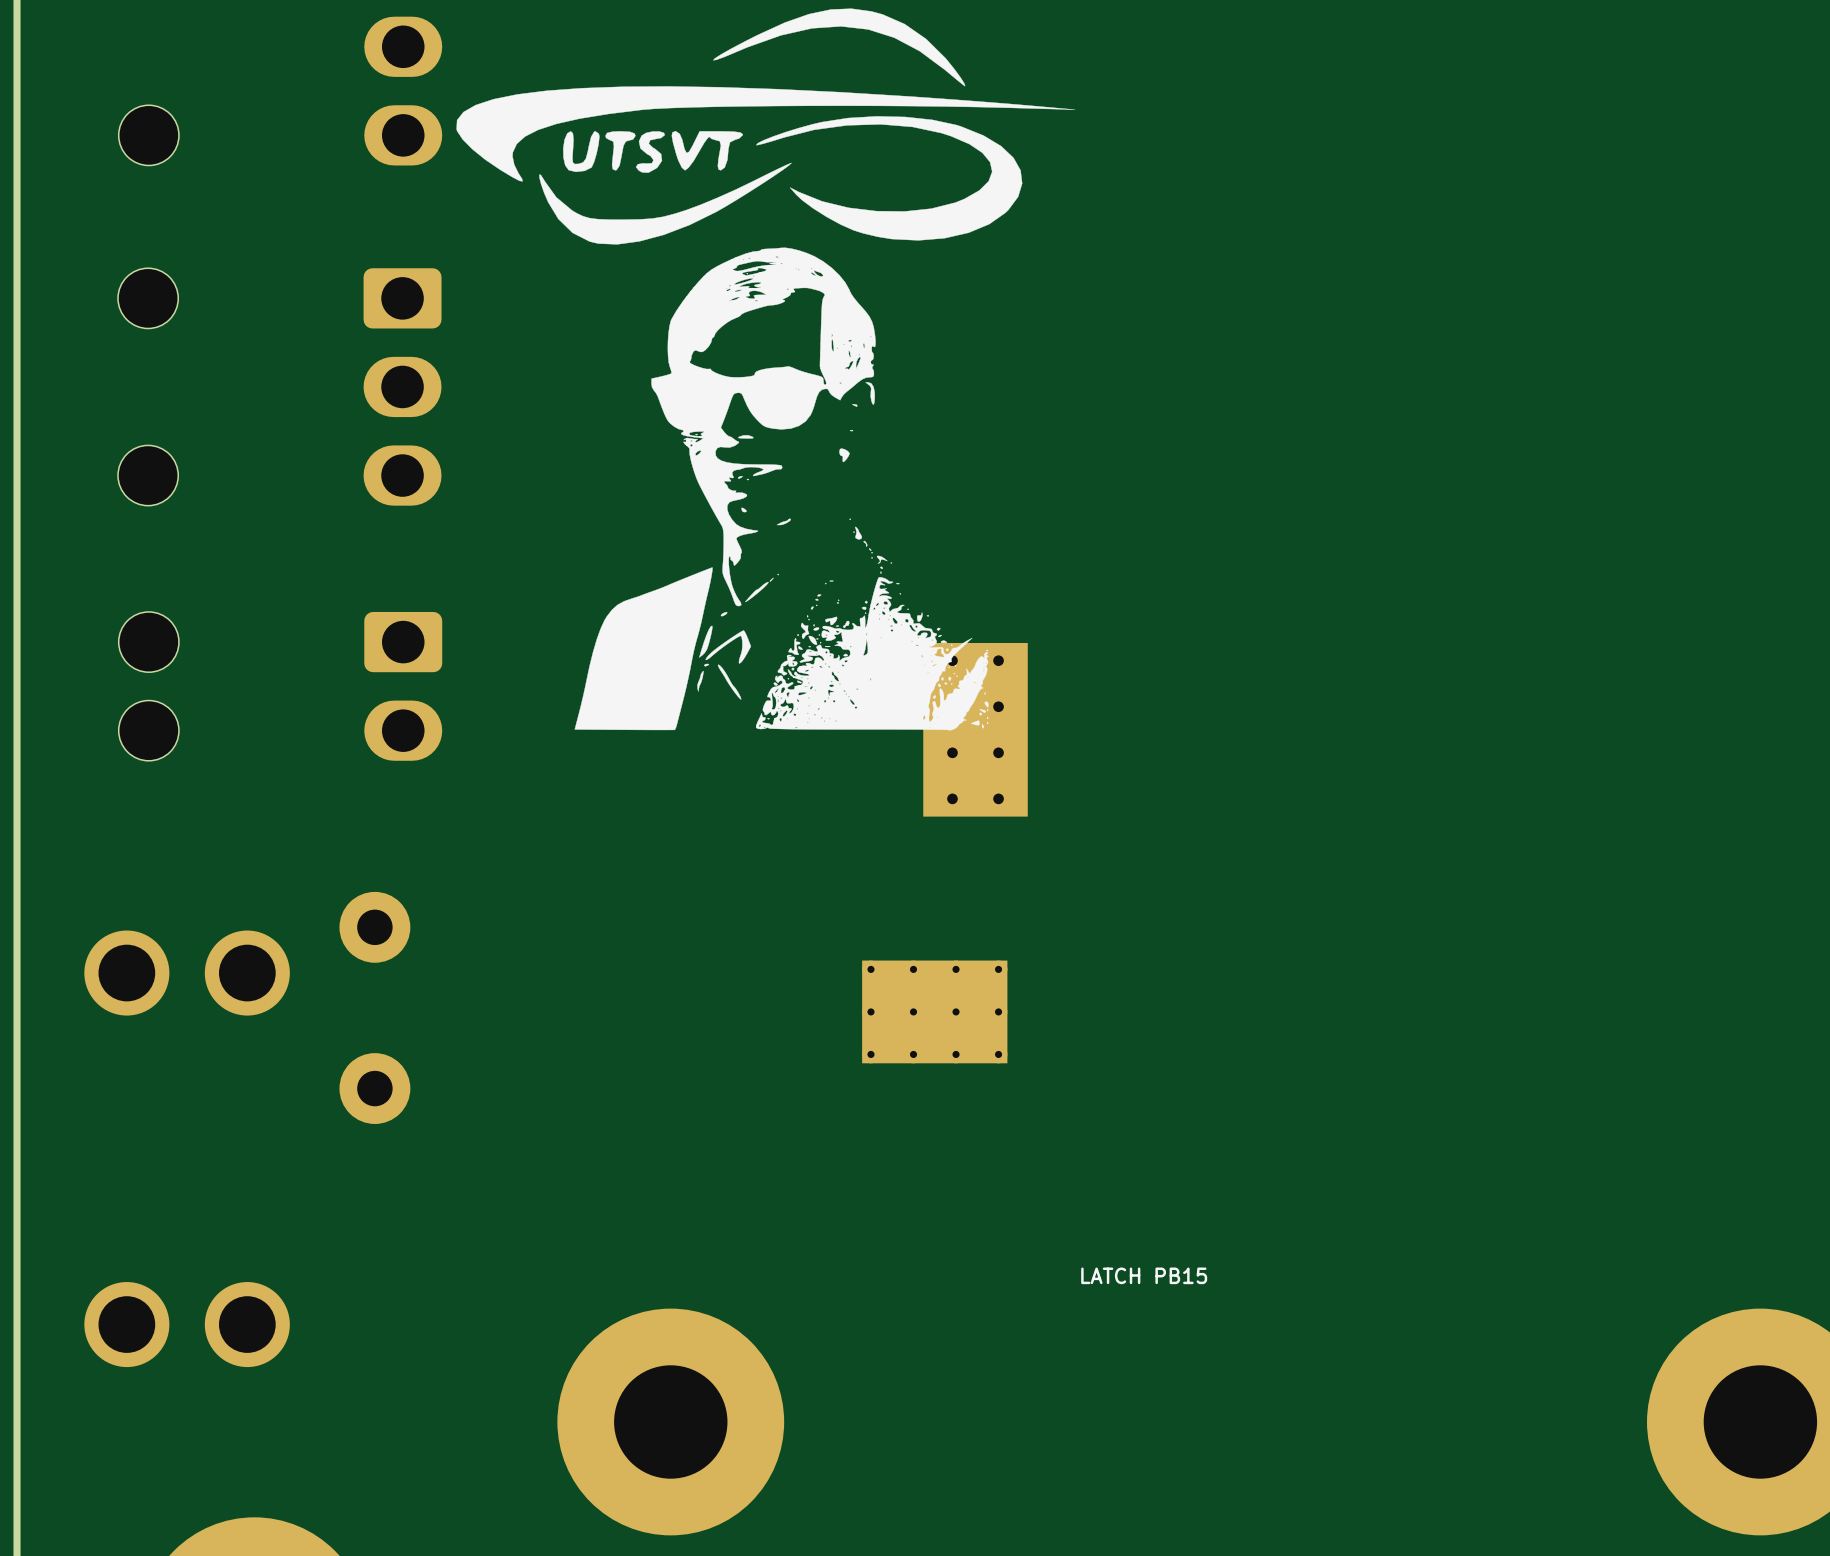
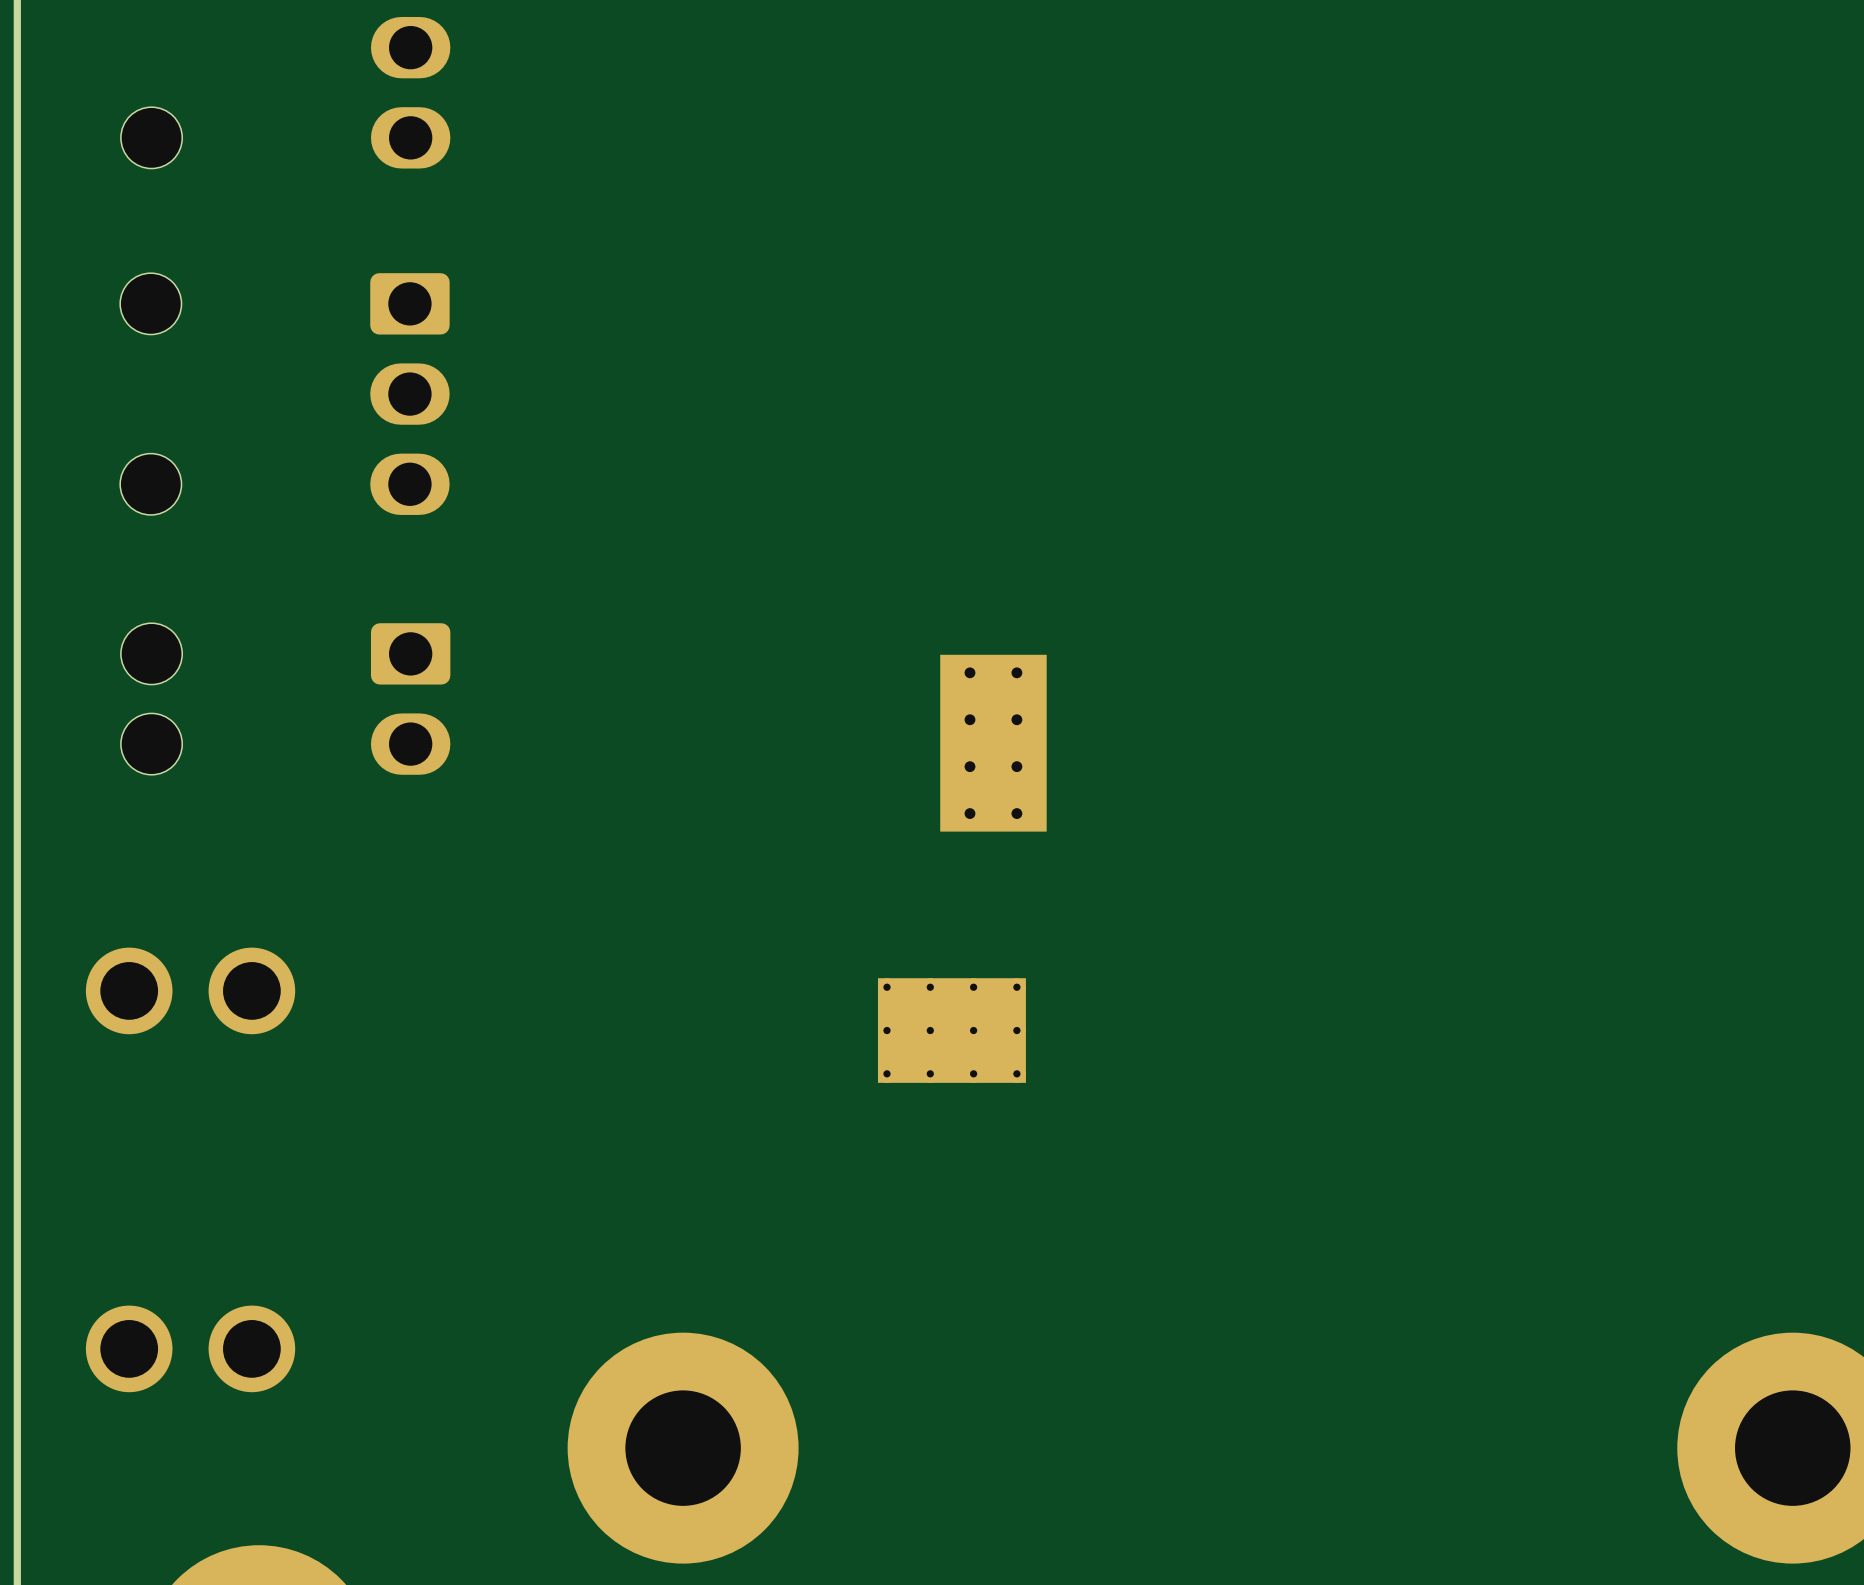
drawing: [456, 8, 1076, 731] -> none
part: (374, 927) -> none
part: (374, 1088) -> none
text: LATCH PB15 (1144, 1275) -> none

